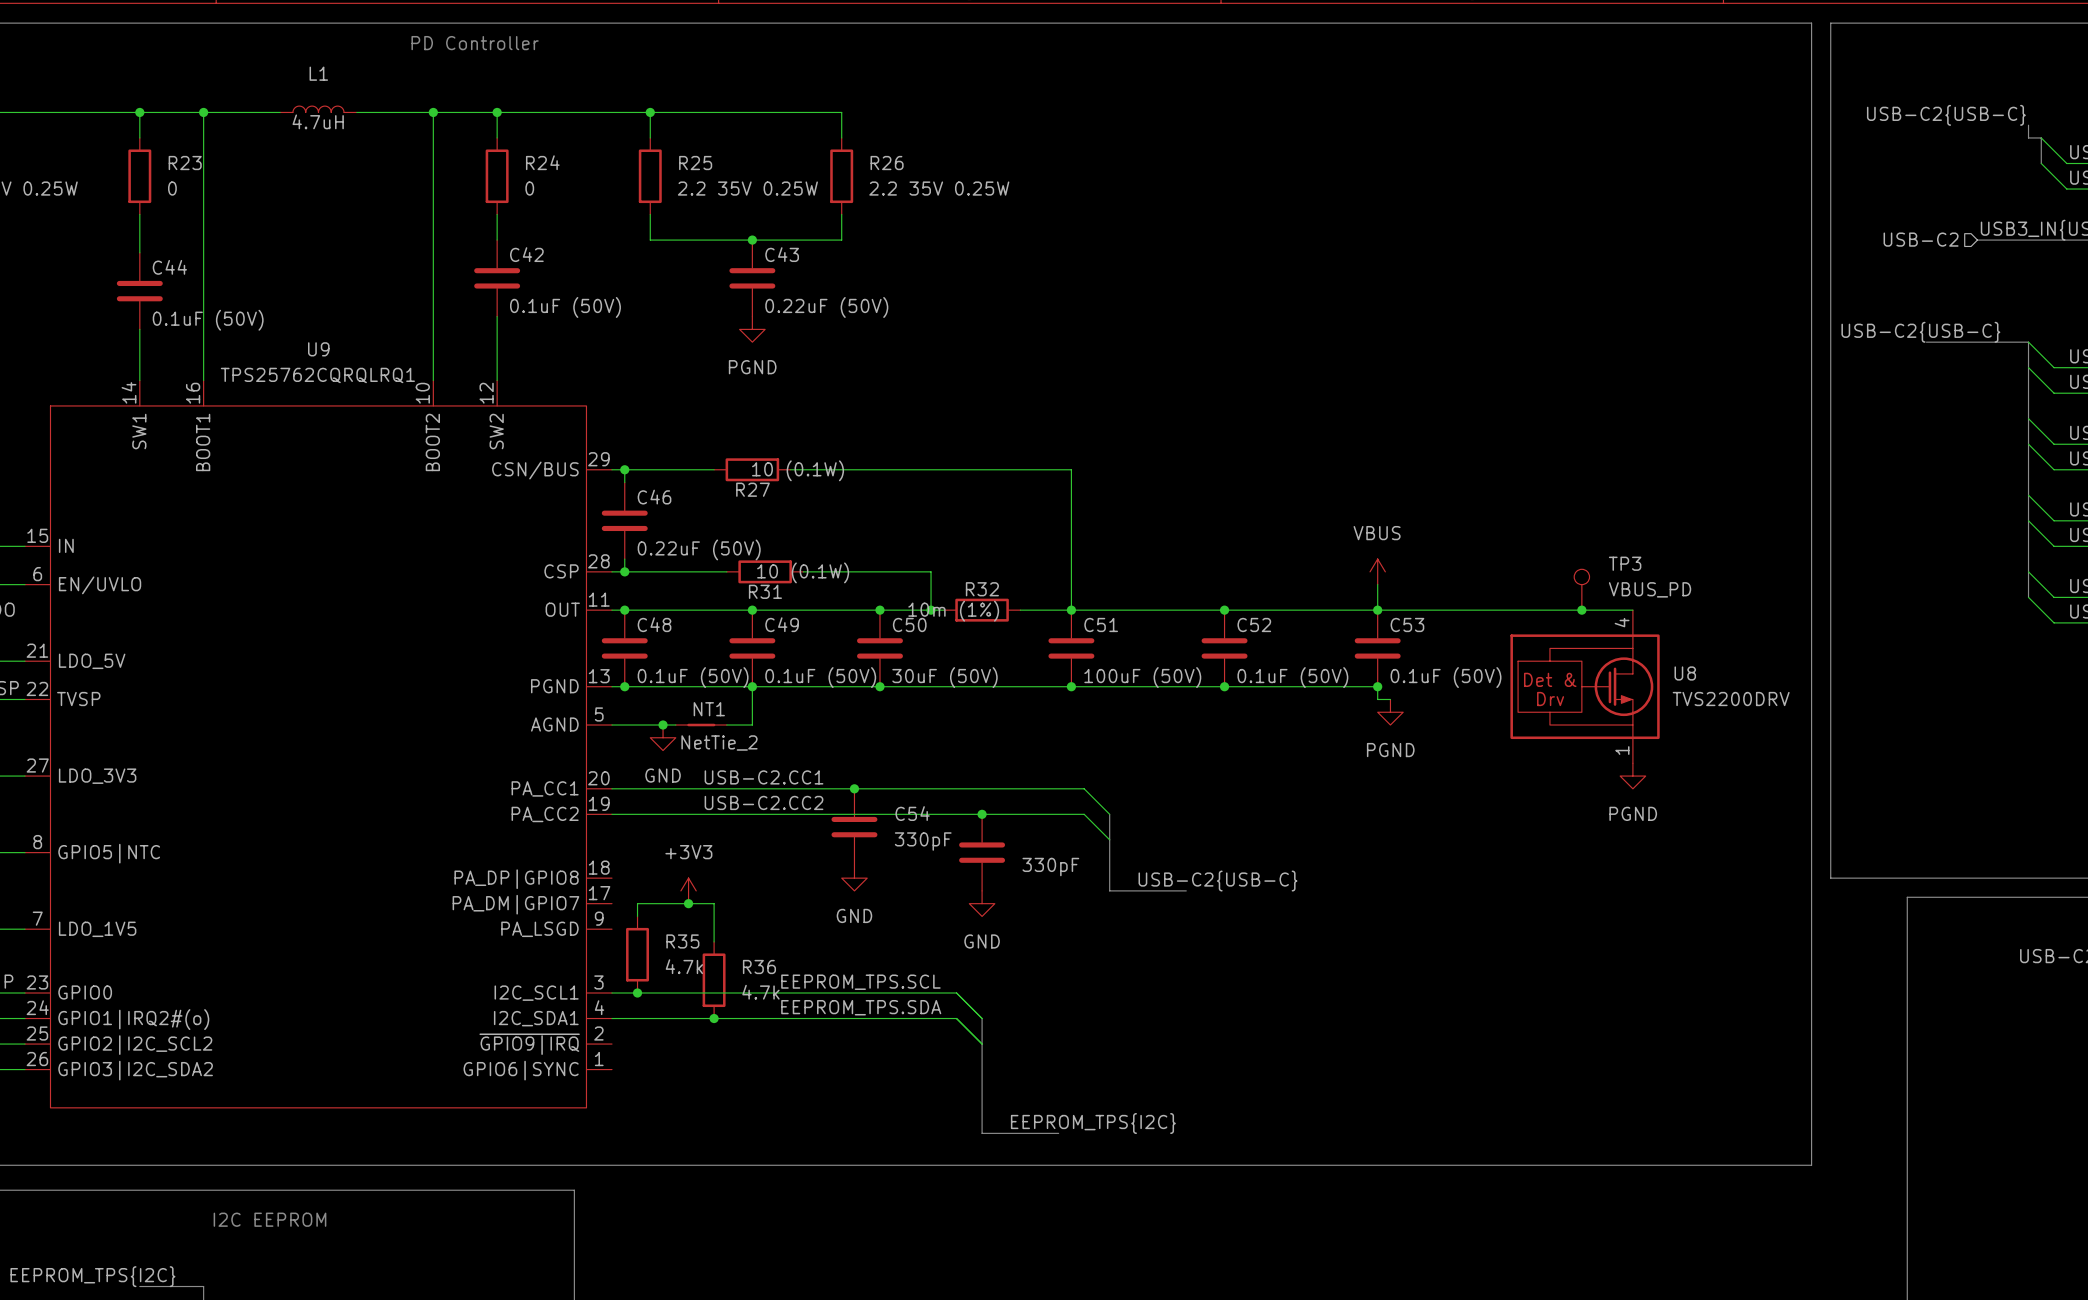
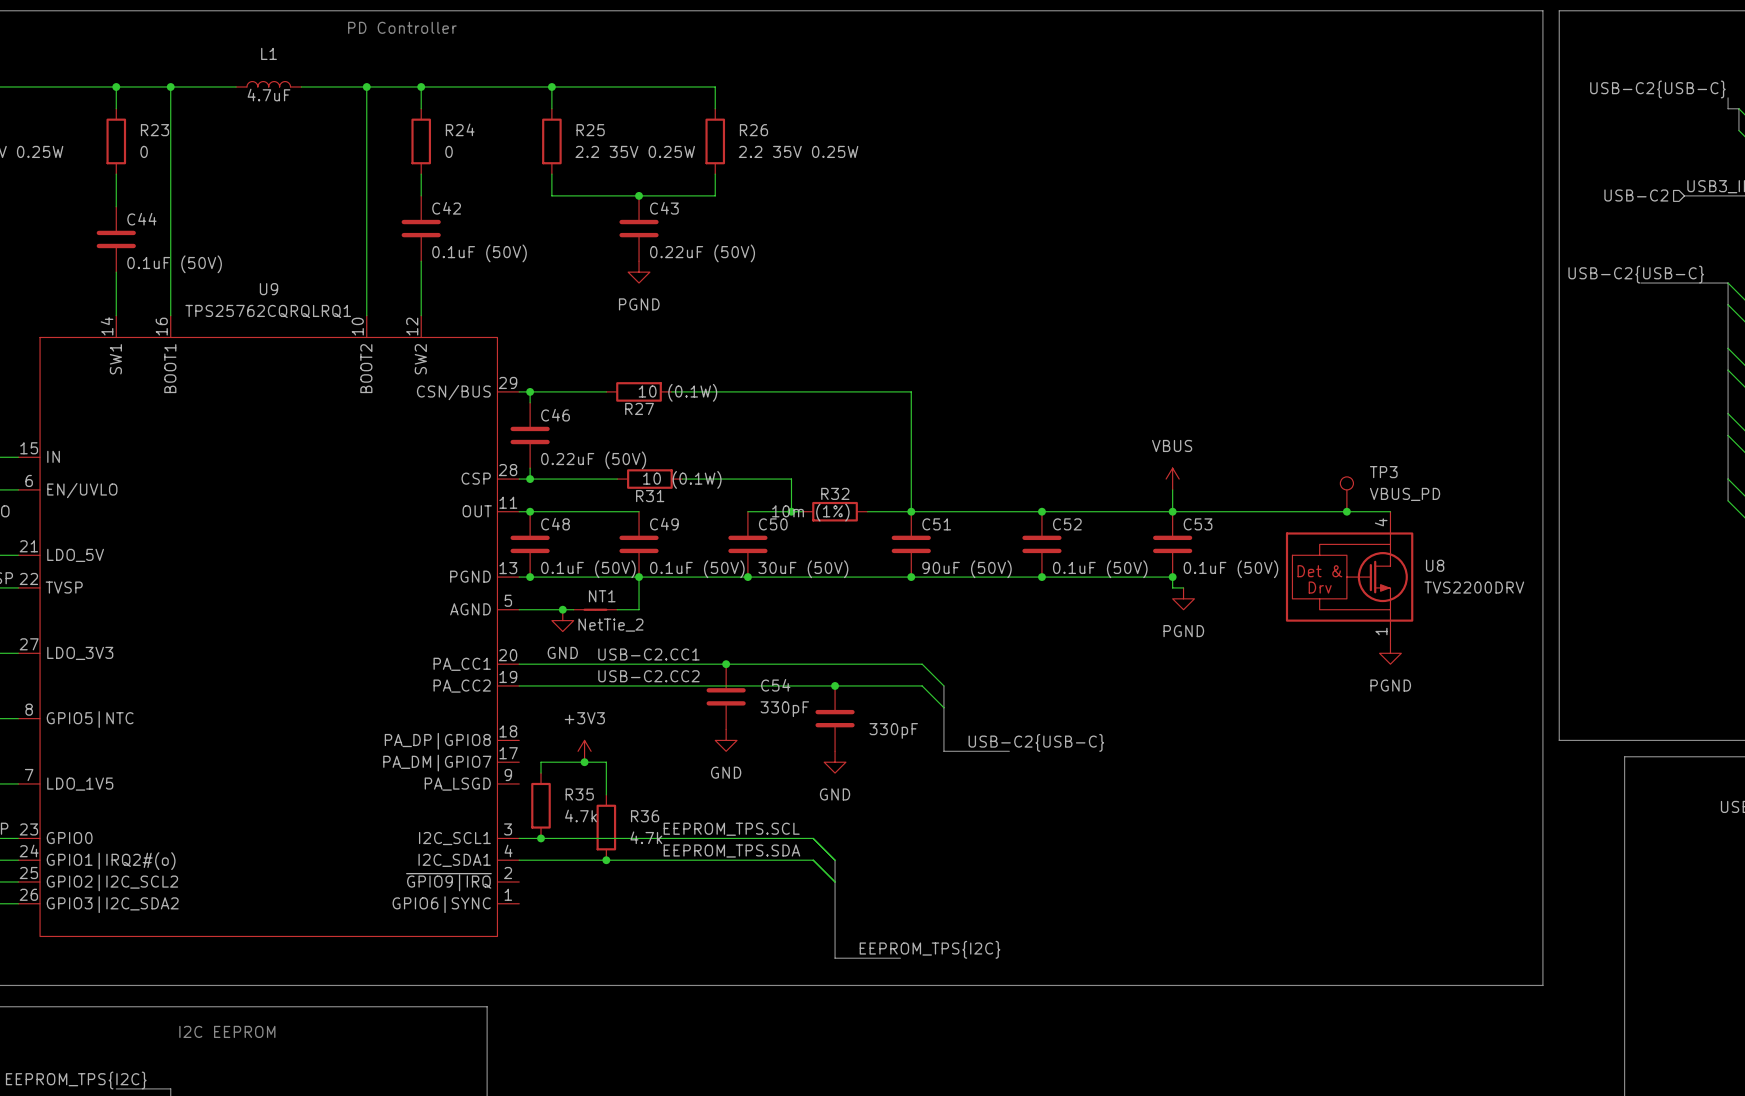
L1 value: 4.7uH (318, 121) -> 4.7uF (269, 95)
wire: (752, 610) (879, 610) -> none
junction: (752, 610) -> none
junction: (879, 610) -> none
C51 value: 100uF (50V) (1142, 677) -> 90uF (50V) (967, 569)

